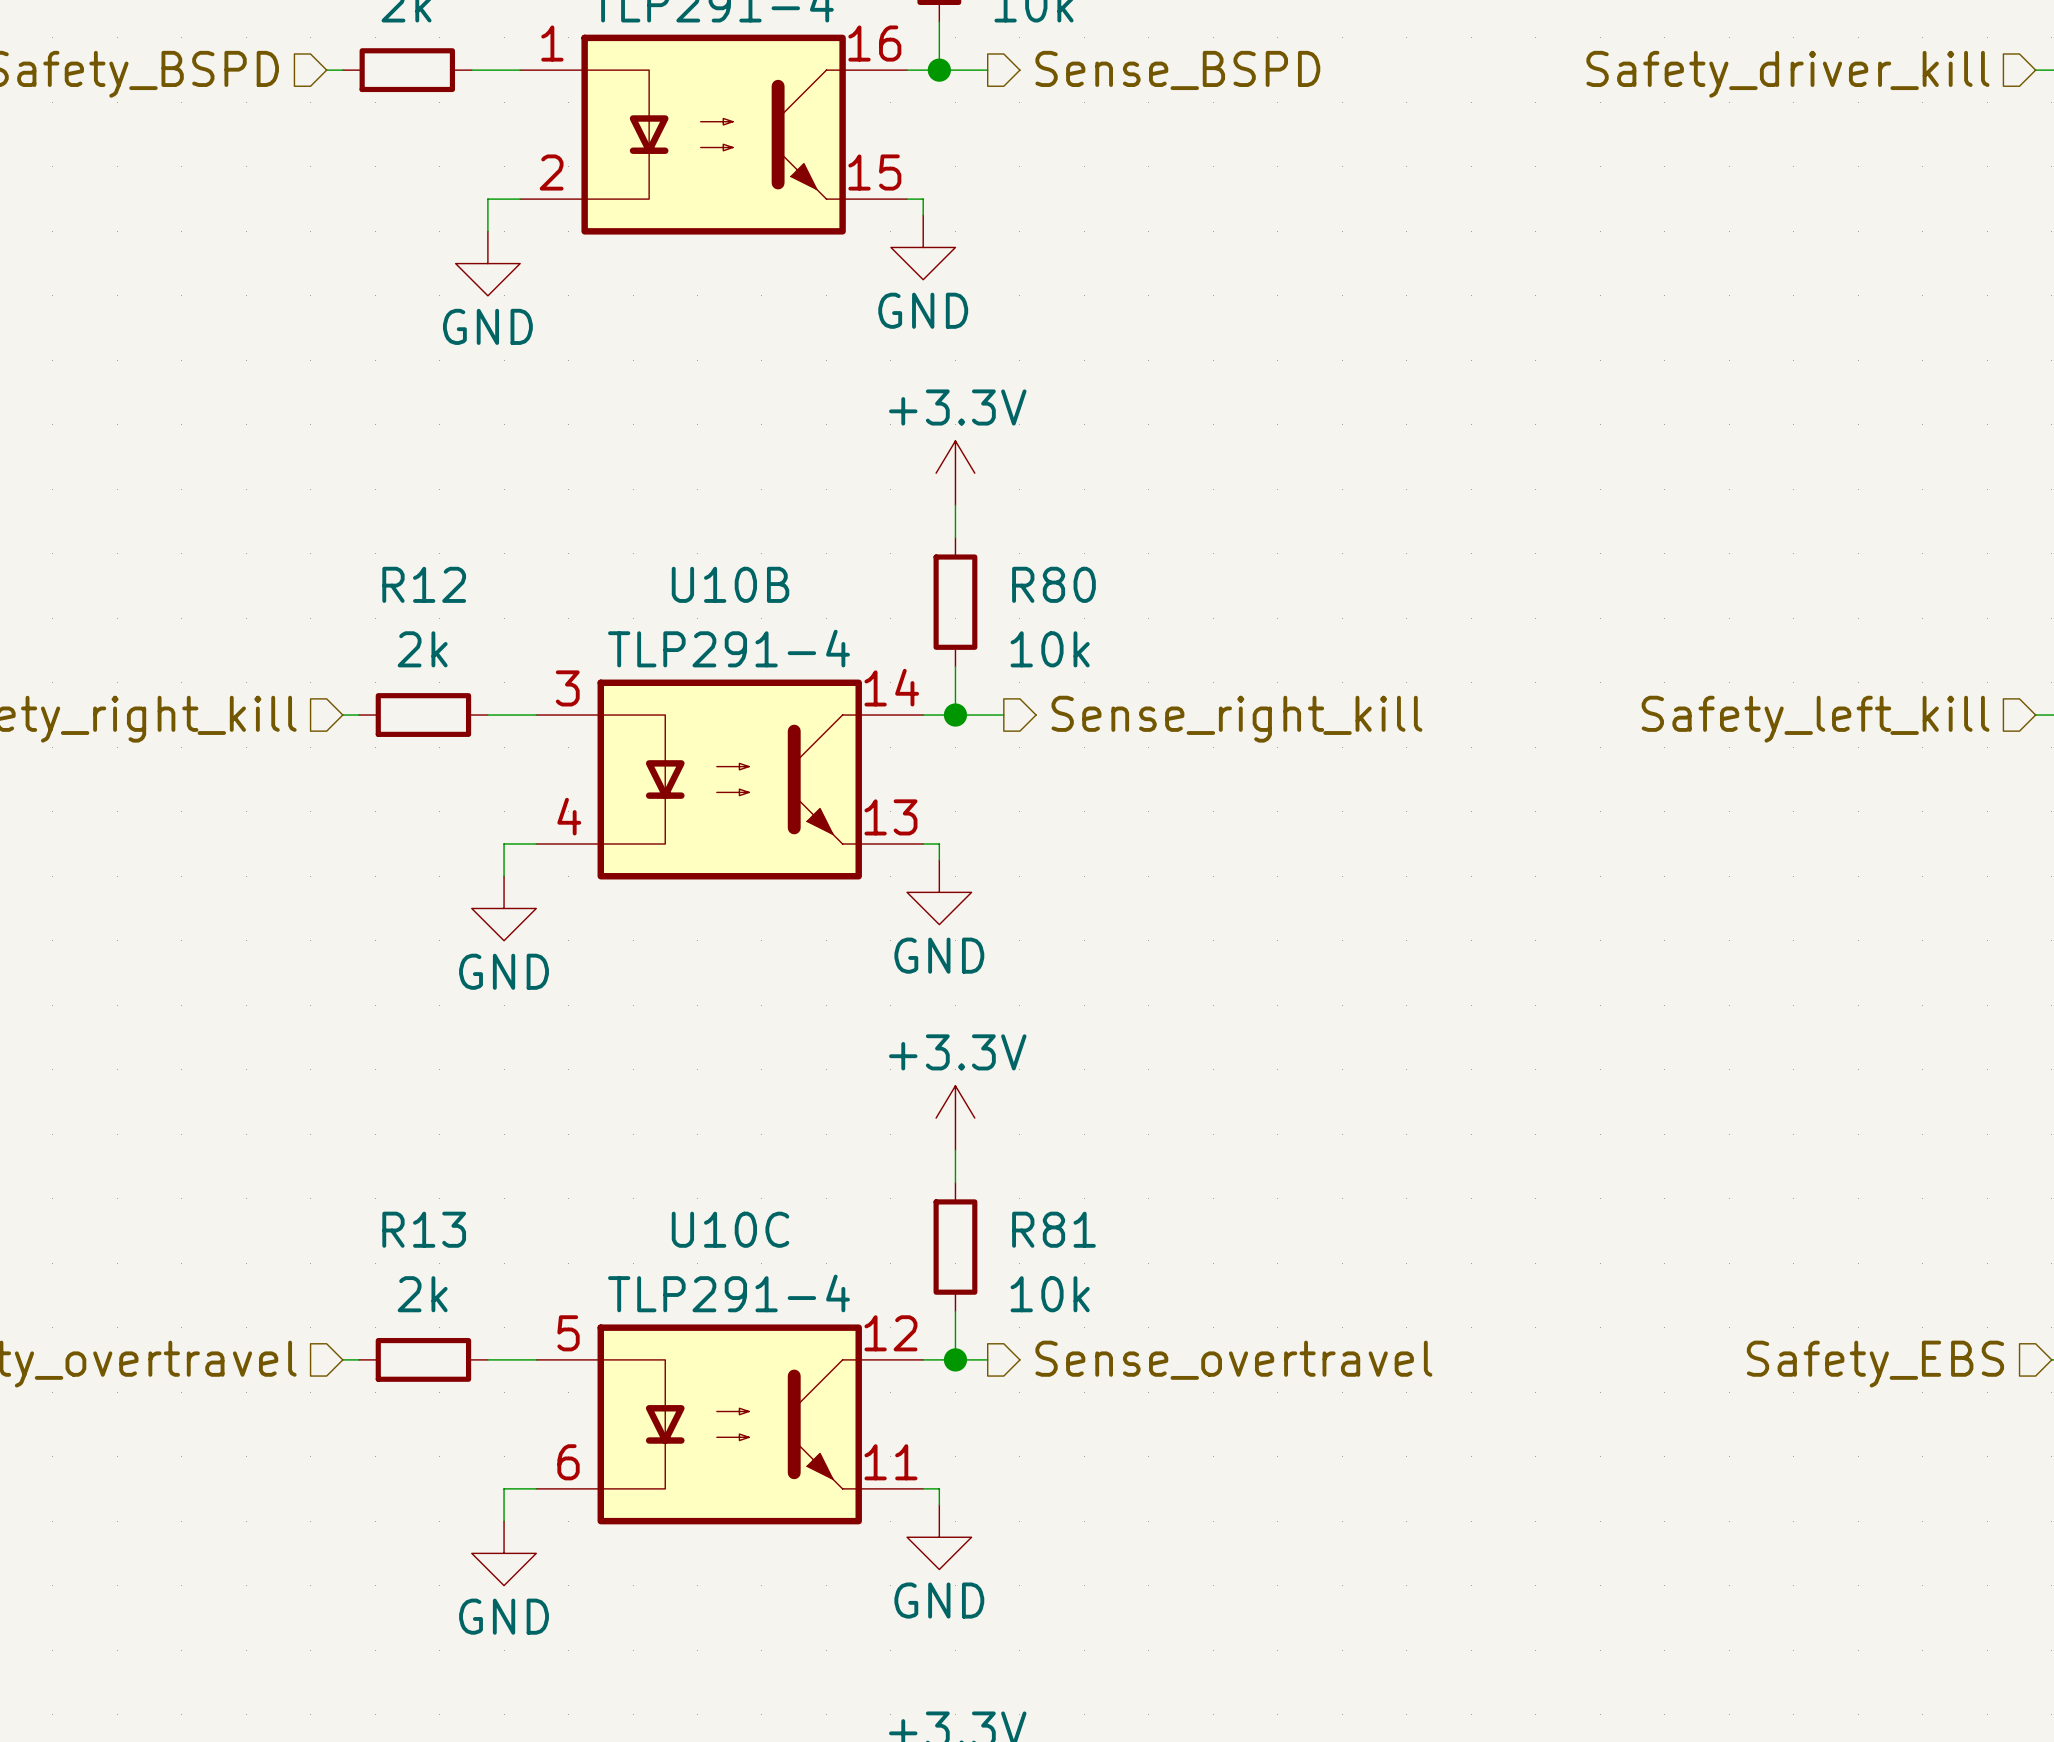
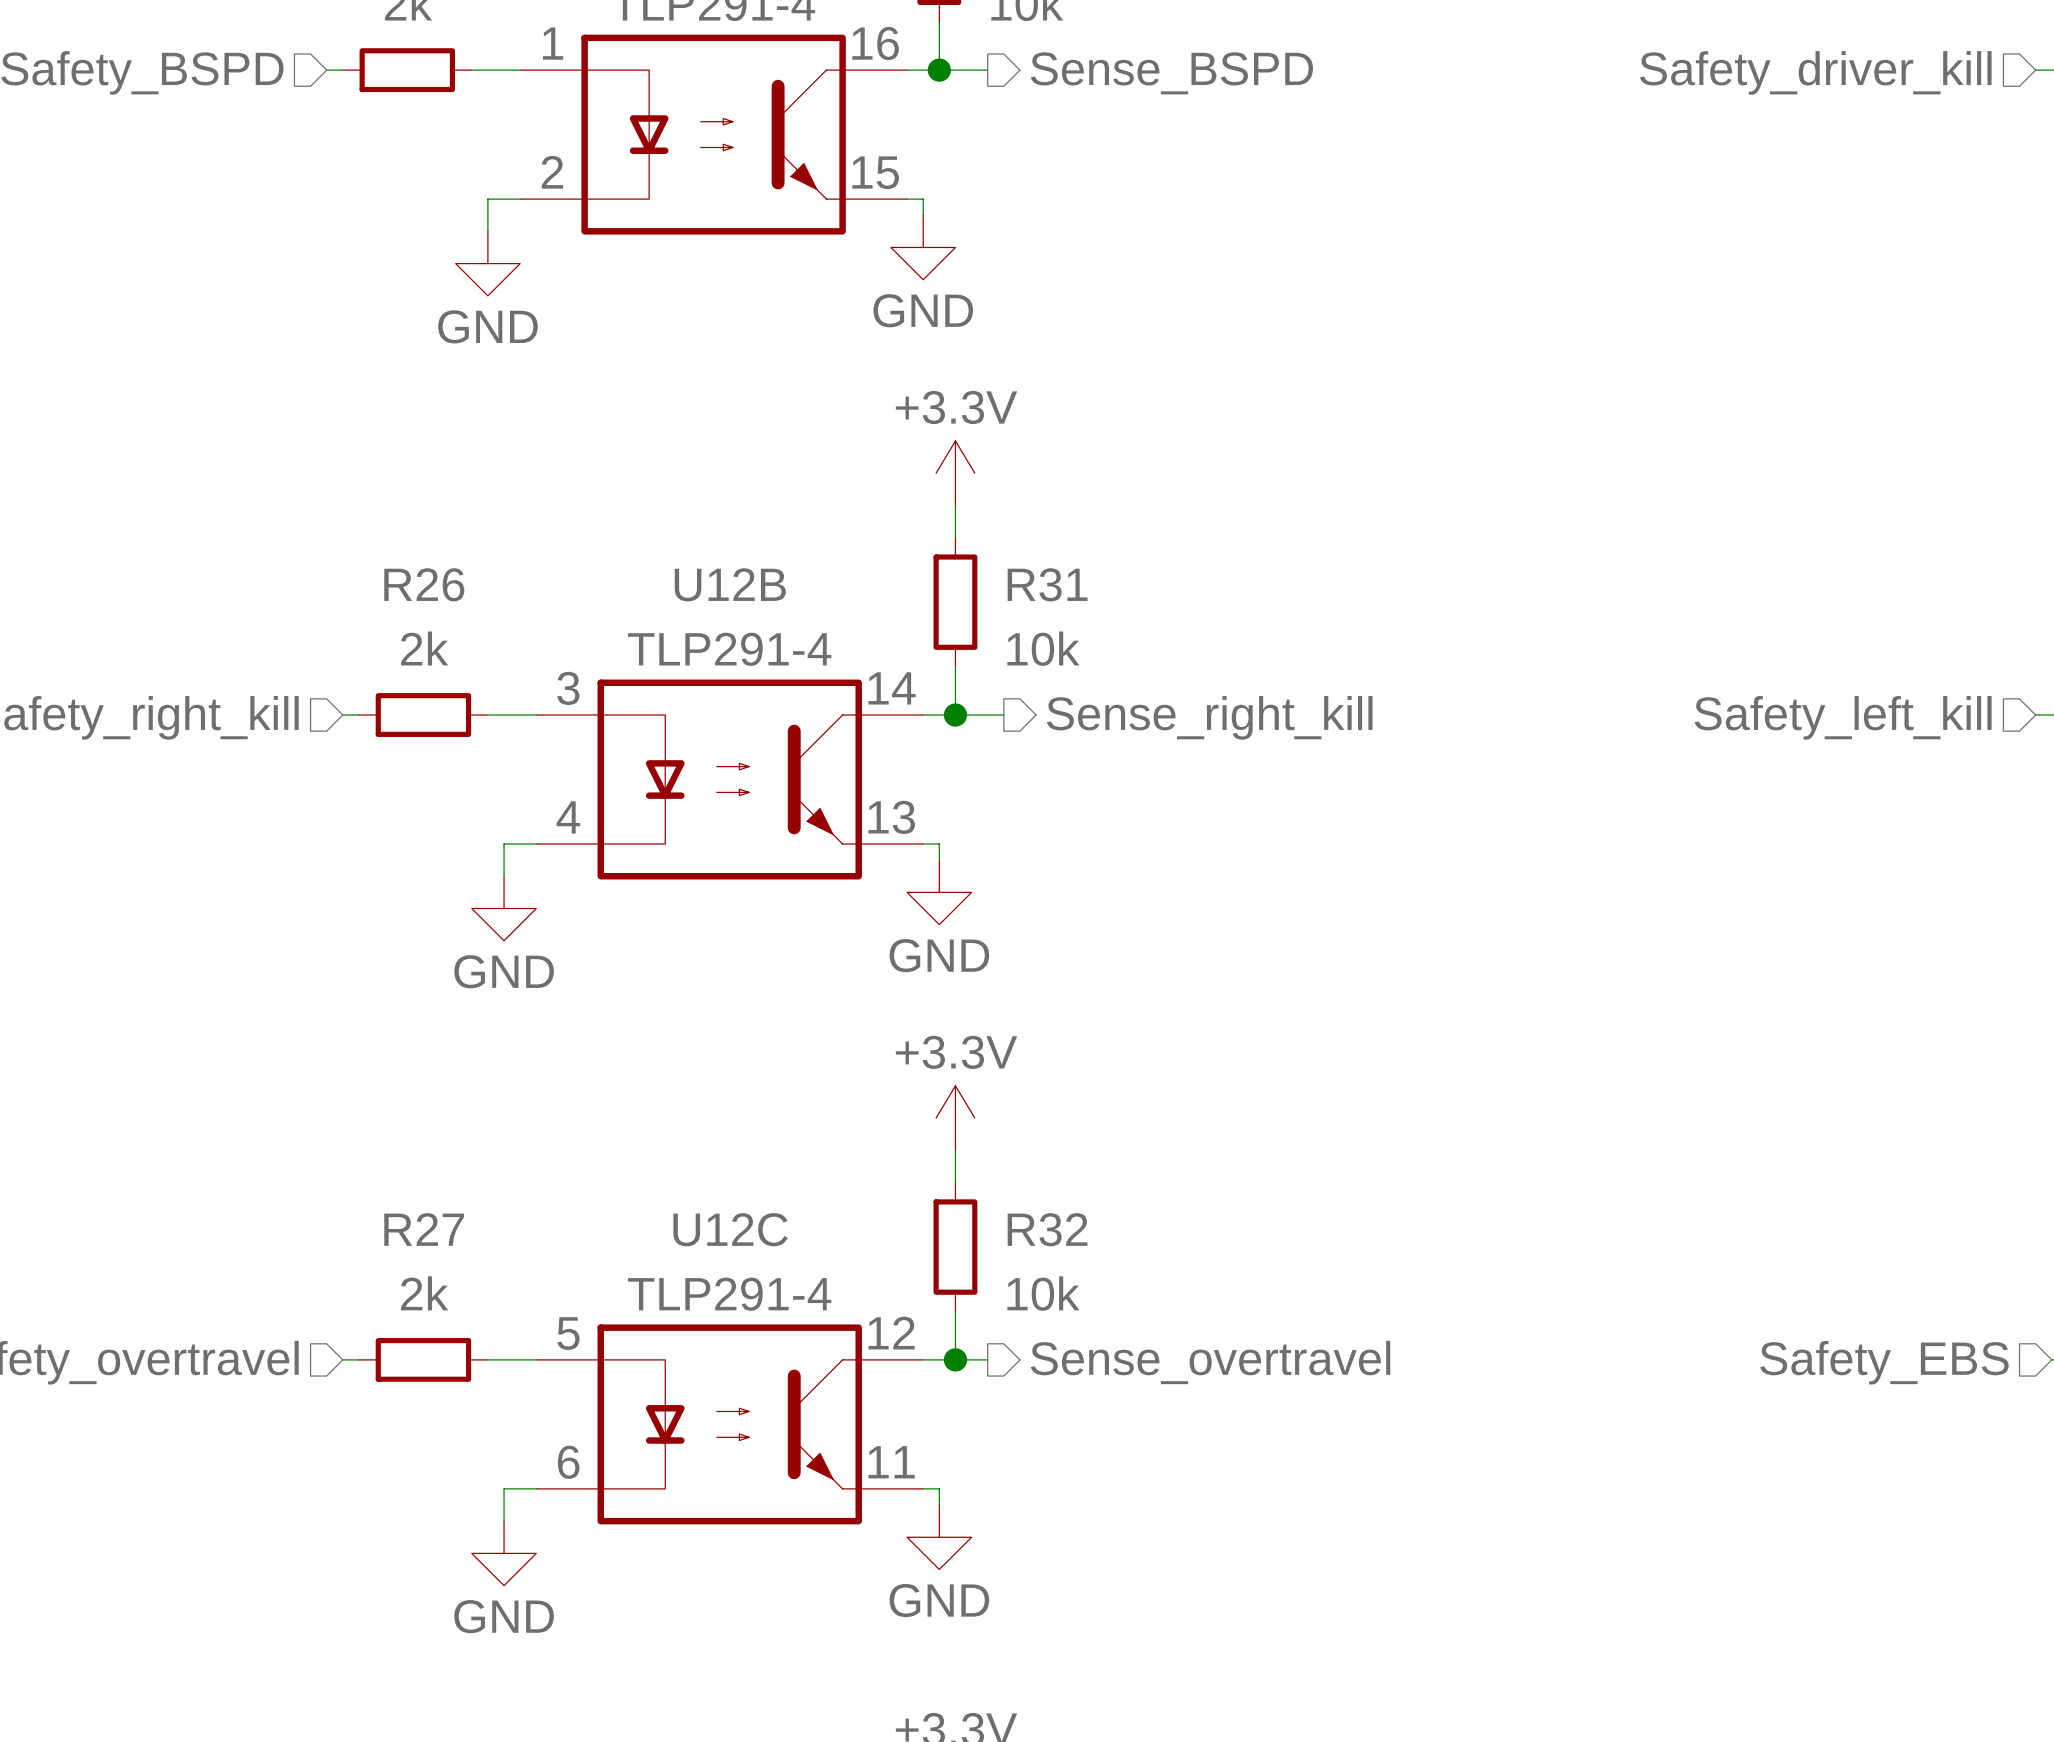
R12 name: R12 (424, 584) -> R26 (424, 584)
U10B name: U10B (730, 584) -> U12B (730, 584)
R80 name: R80 (1053, 584) -> R31 (1047, 584)
R13 name: R13 (424, 1229) -> R27 (424, 1229)
U10C name: U10C (730, 1229) -> U12C (730, 1229)
R81 name: R81 (1053, 1229) -> R32 (1047, 1229)

